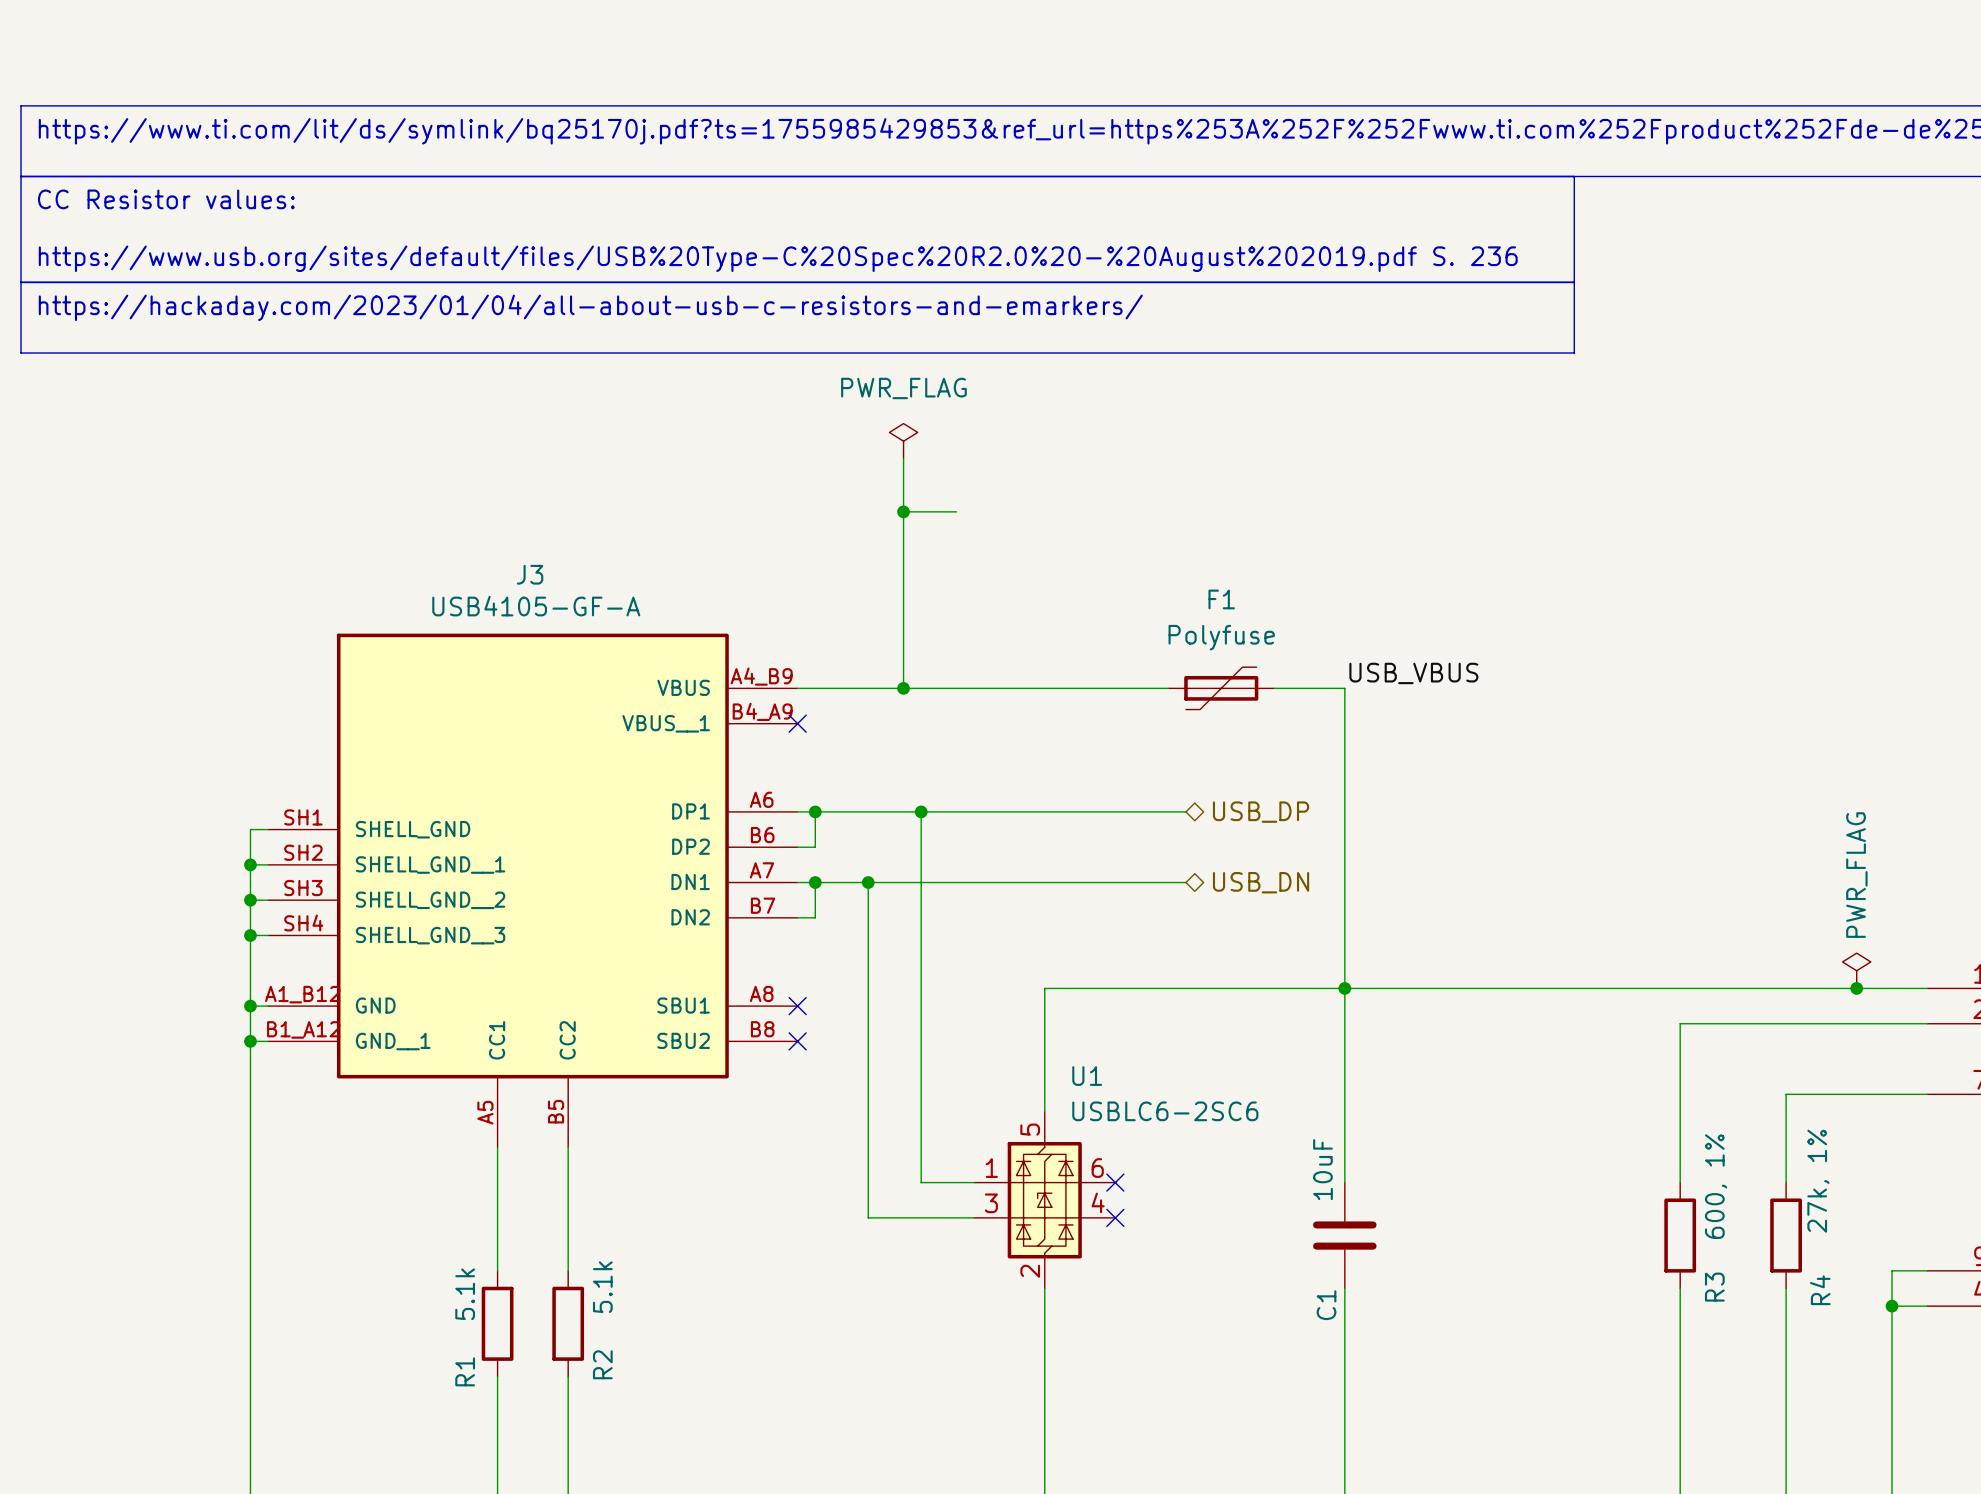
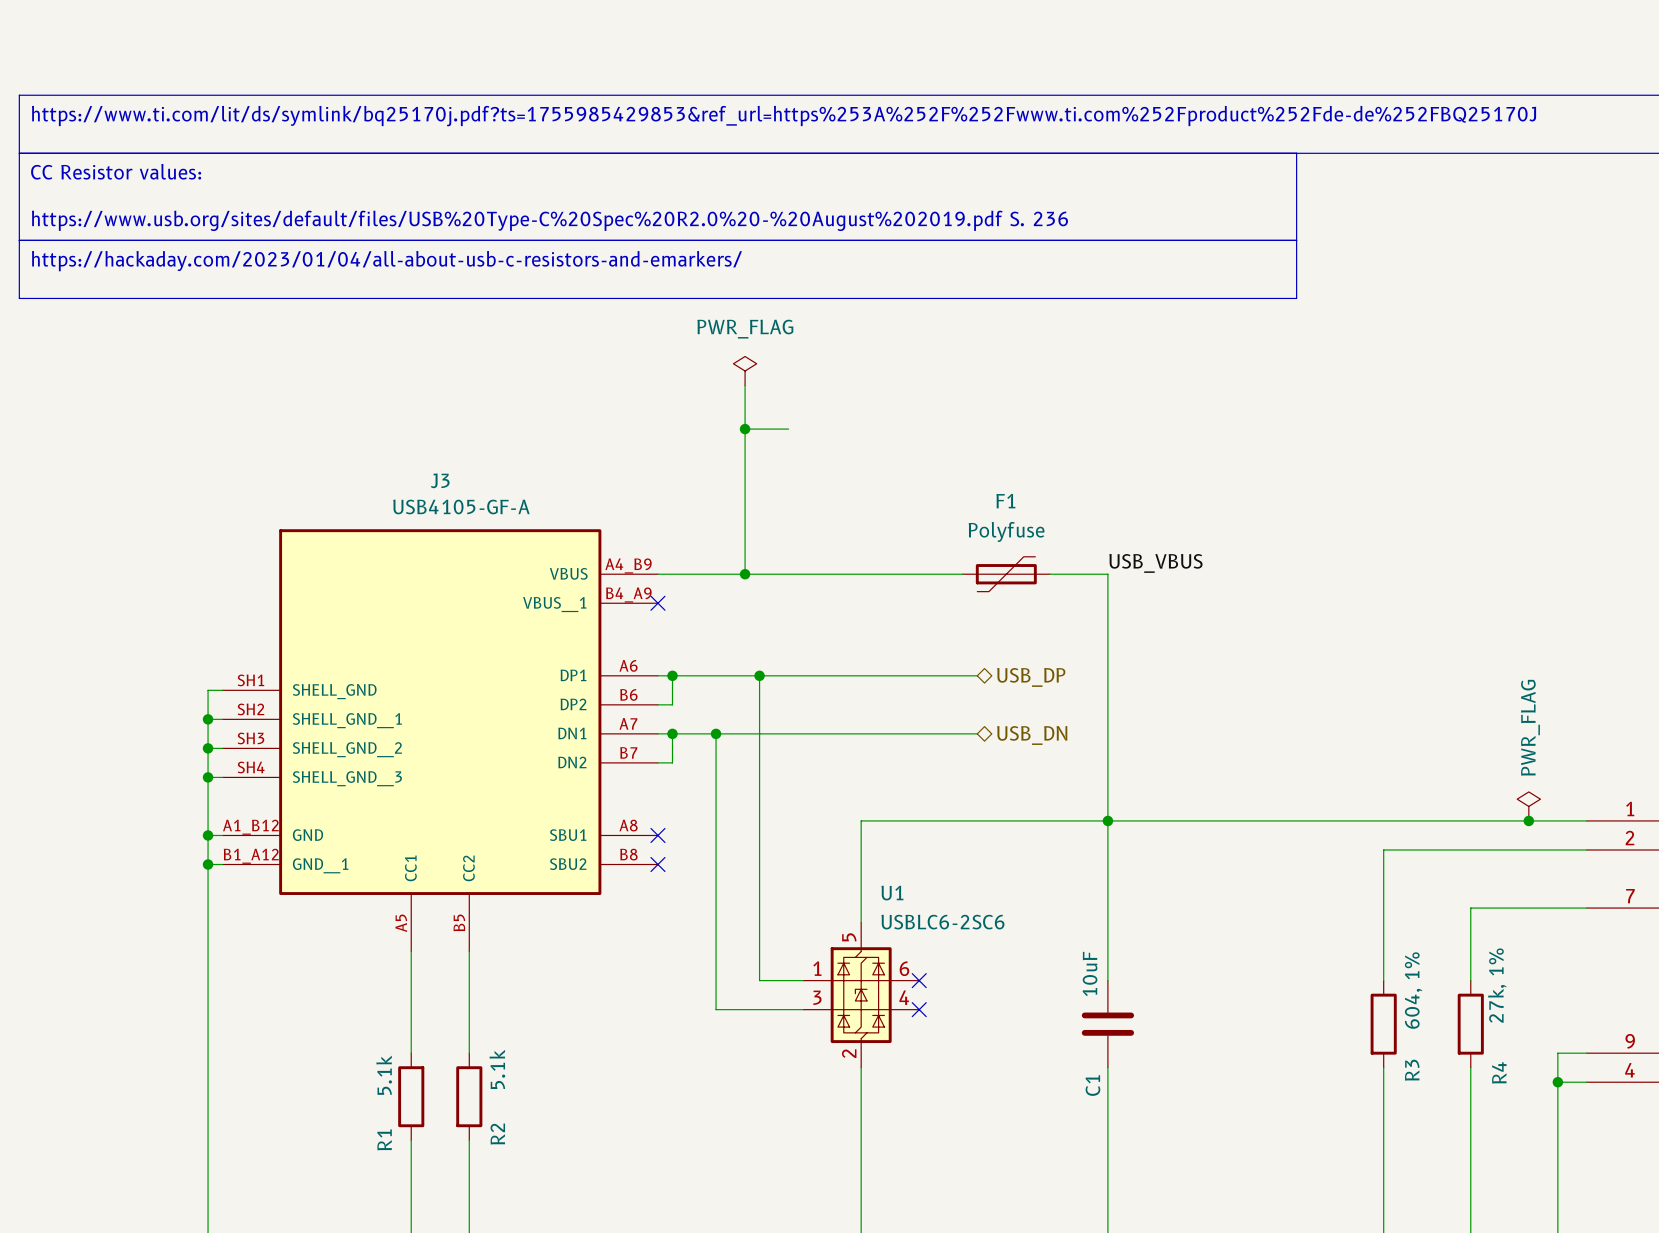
R3 value: 600, 1% (1716, 1186) -> 604, 1% (1413, 990)

